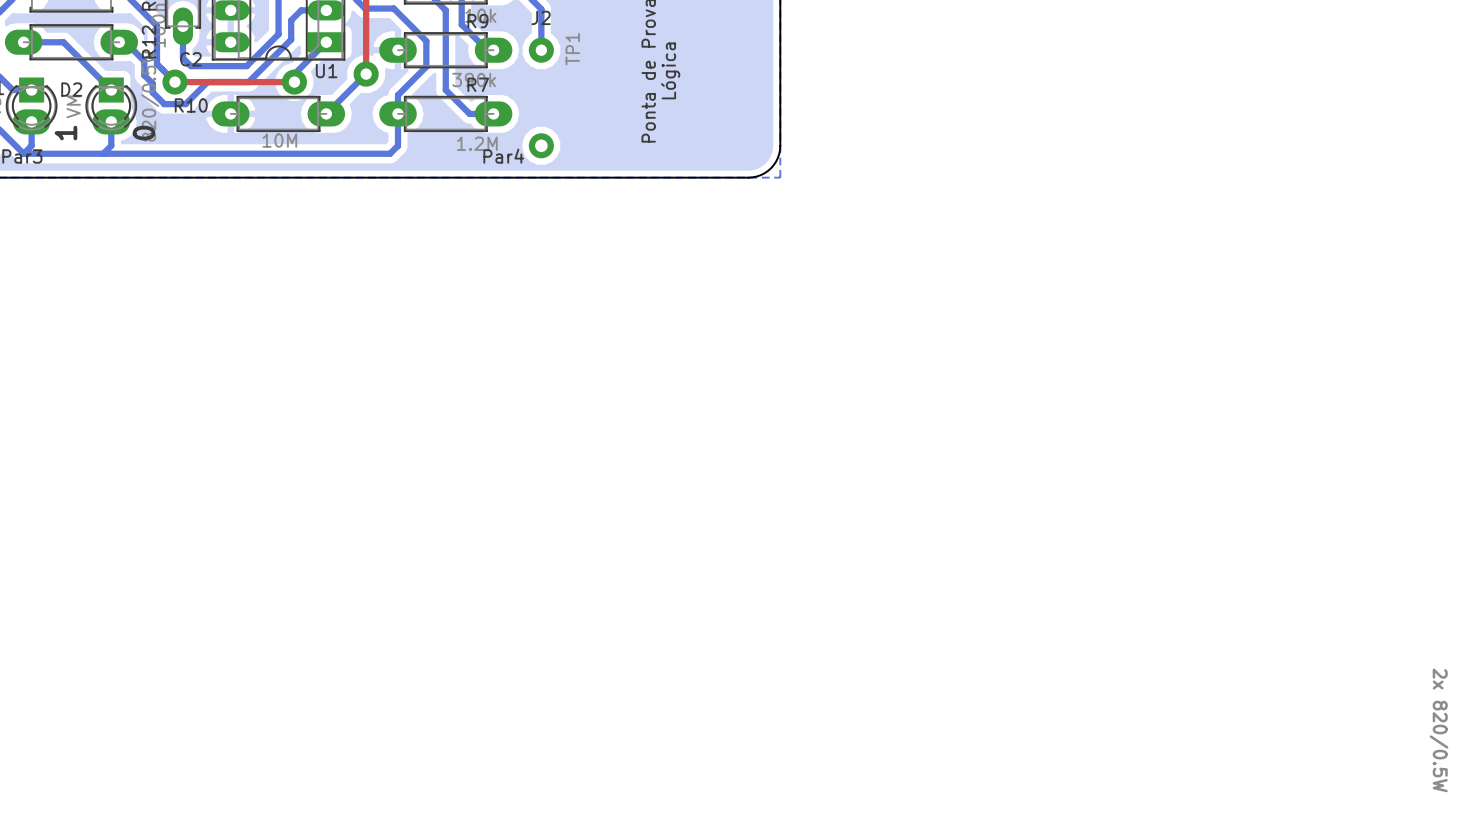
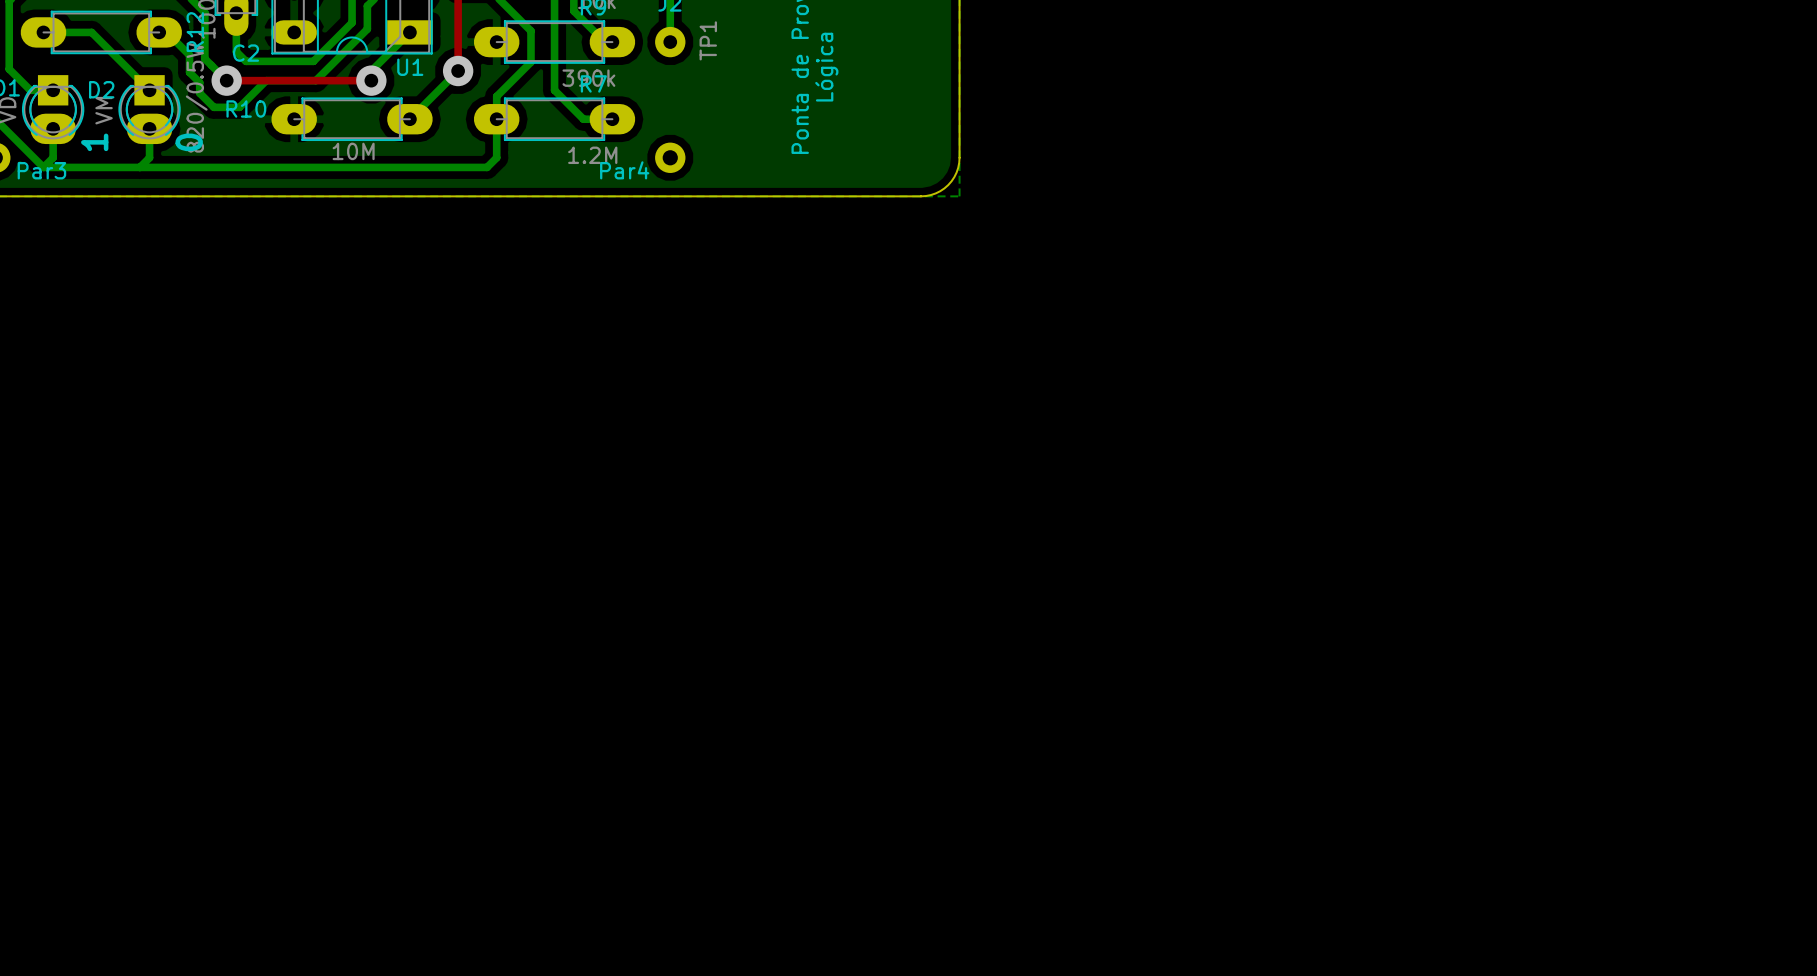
text: 2x 820/0.5W (1439, 730) -> none

